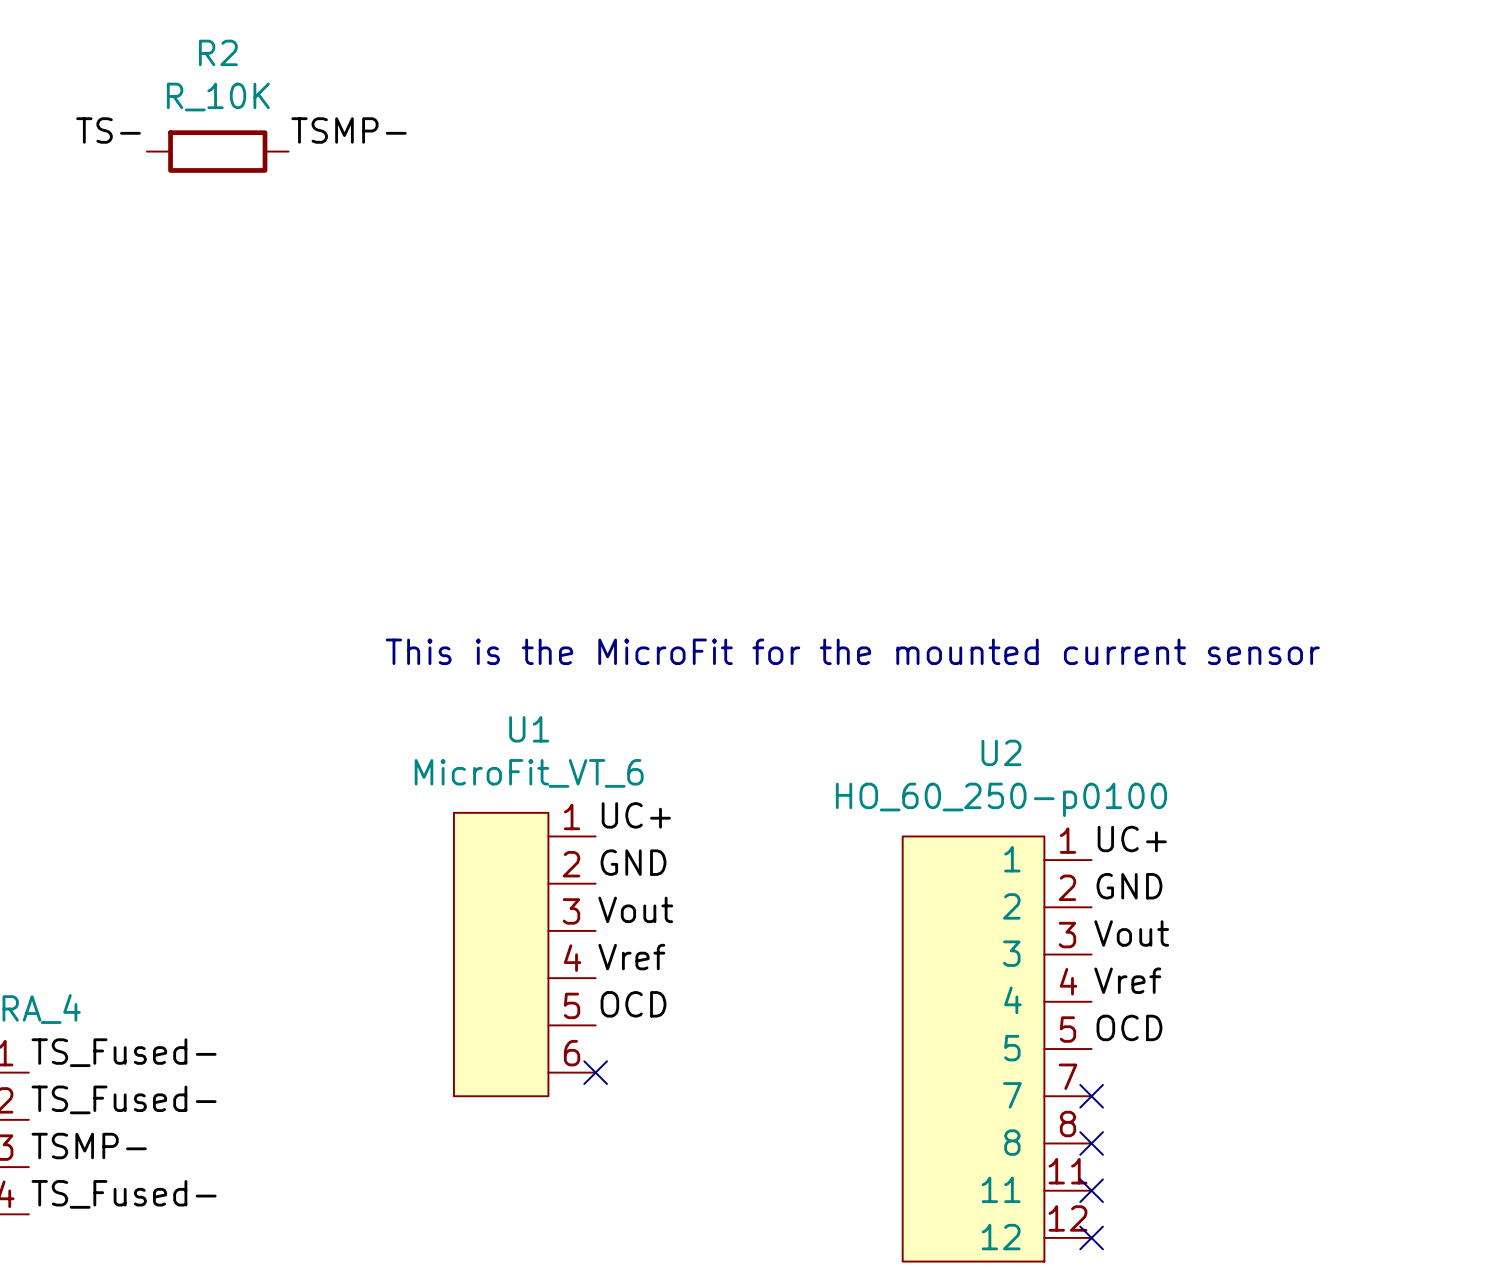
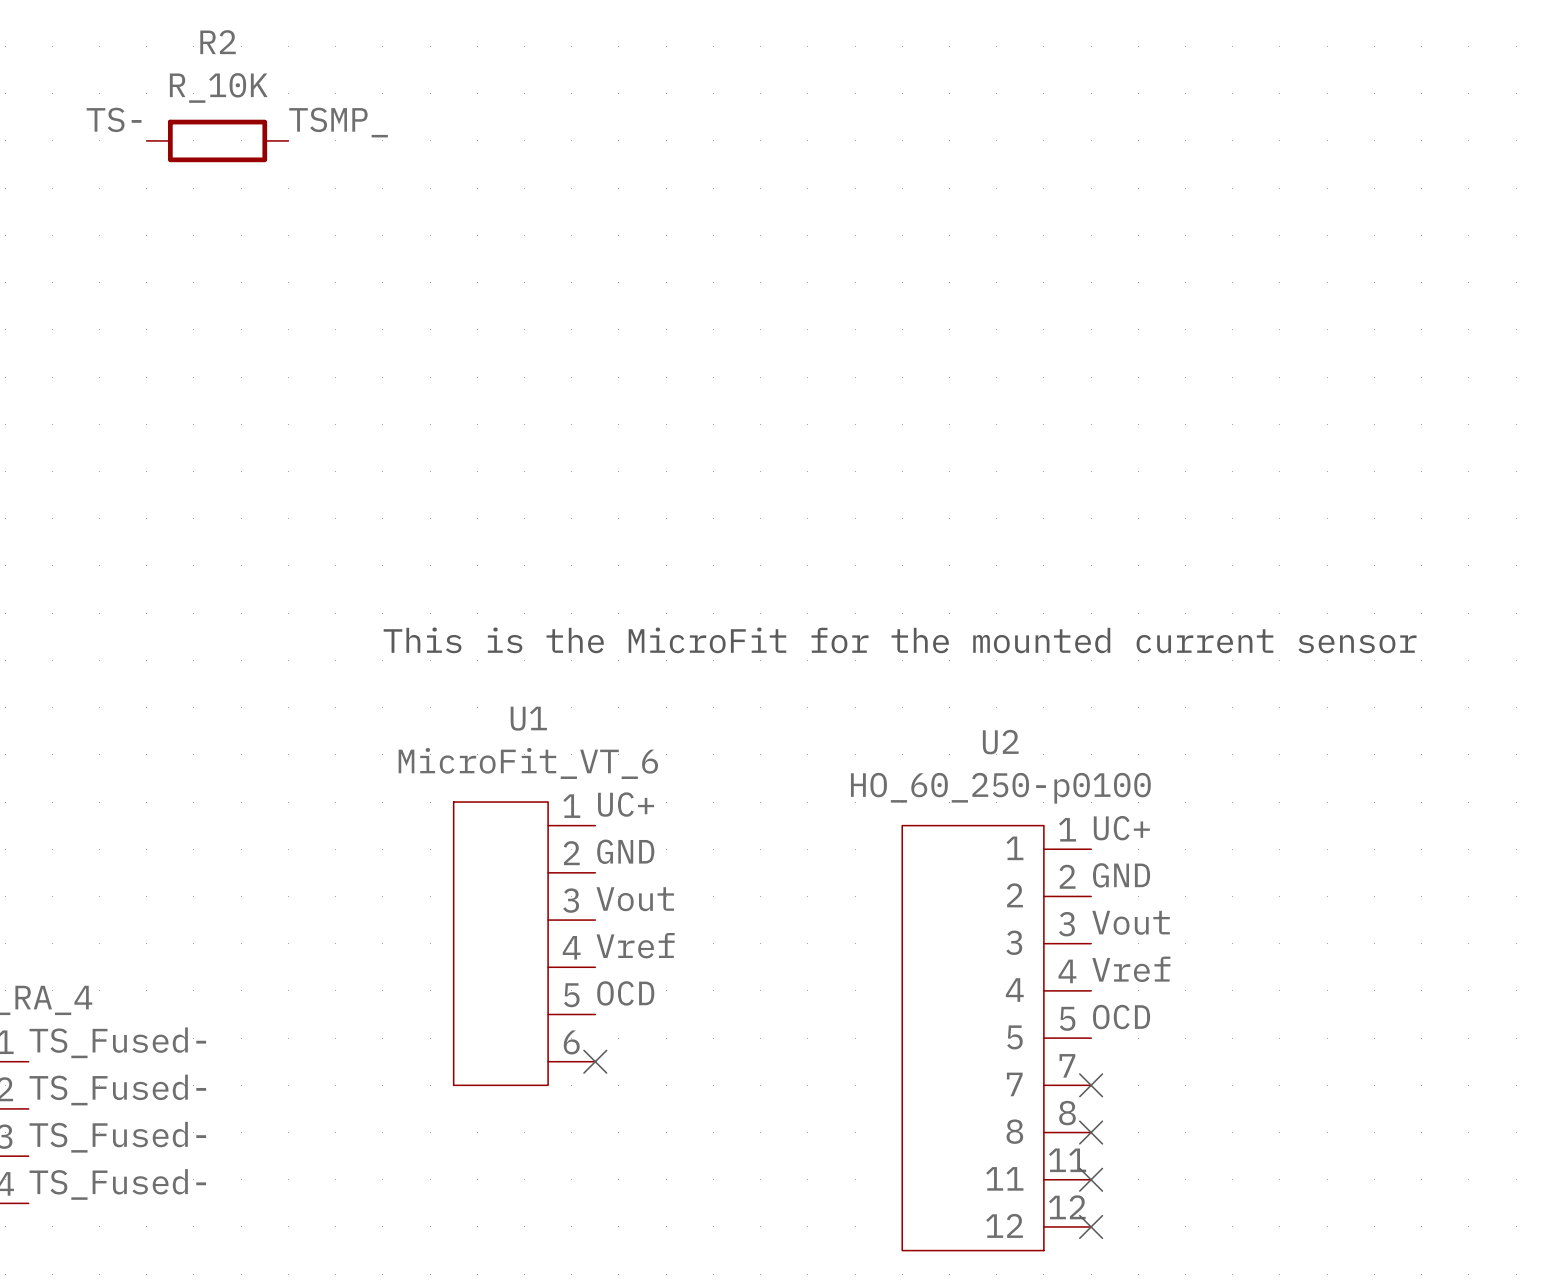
label: TSMP- (348, 130) -> TSMP_ (338, 122)
label: TSMP- (89, 1146) -> TS_Fused- (117, 1137)

